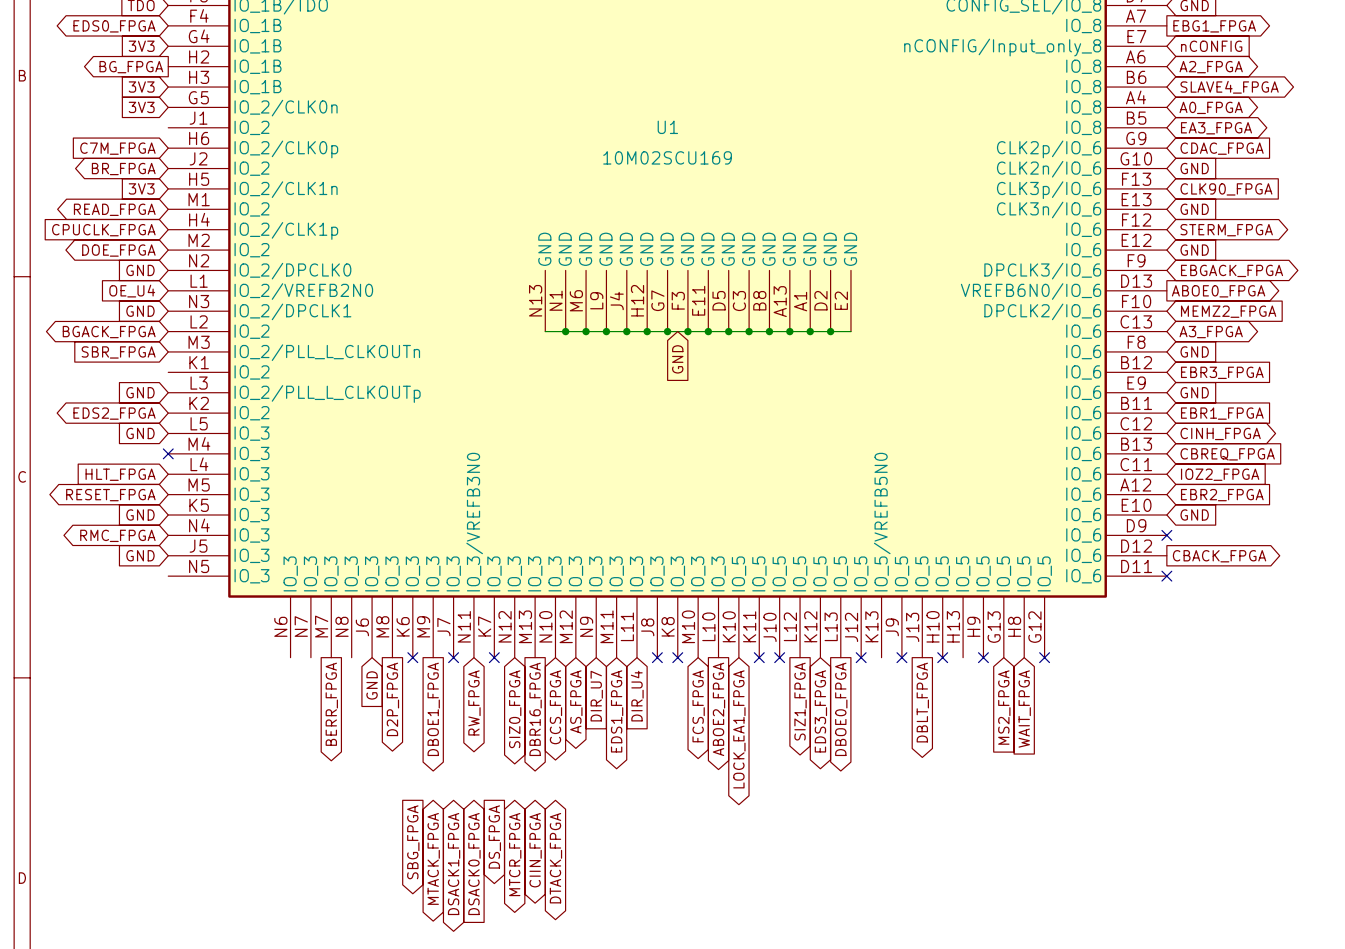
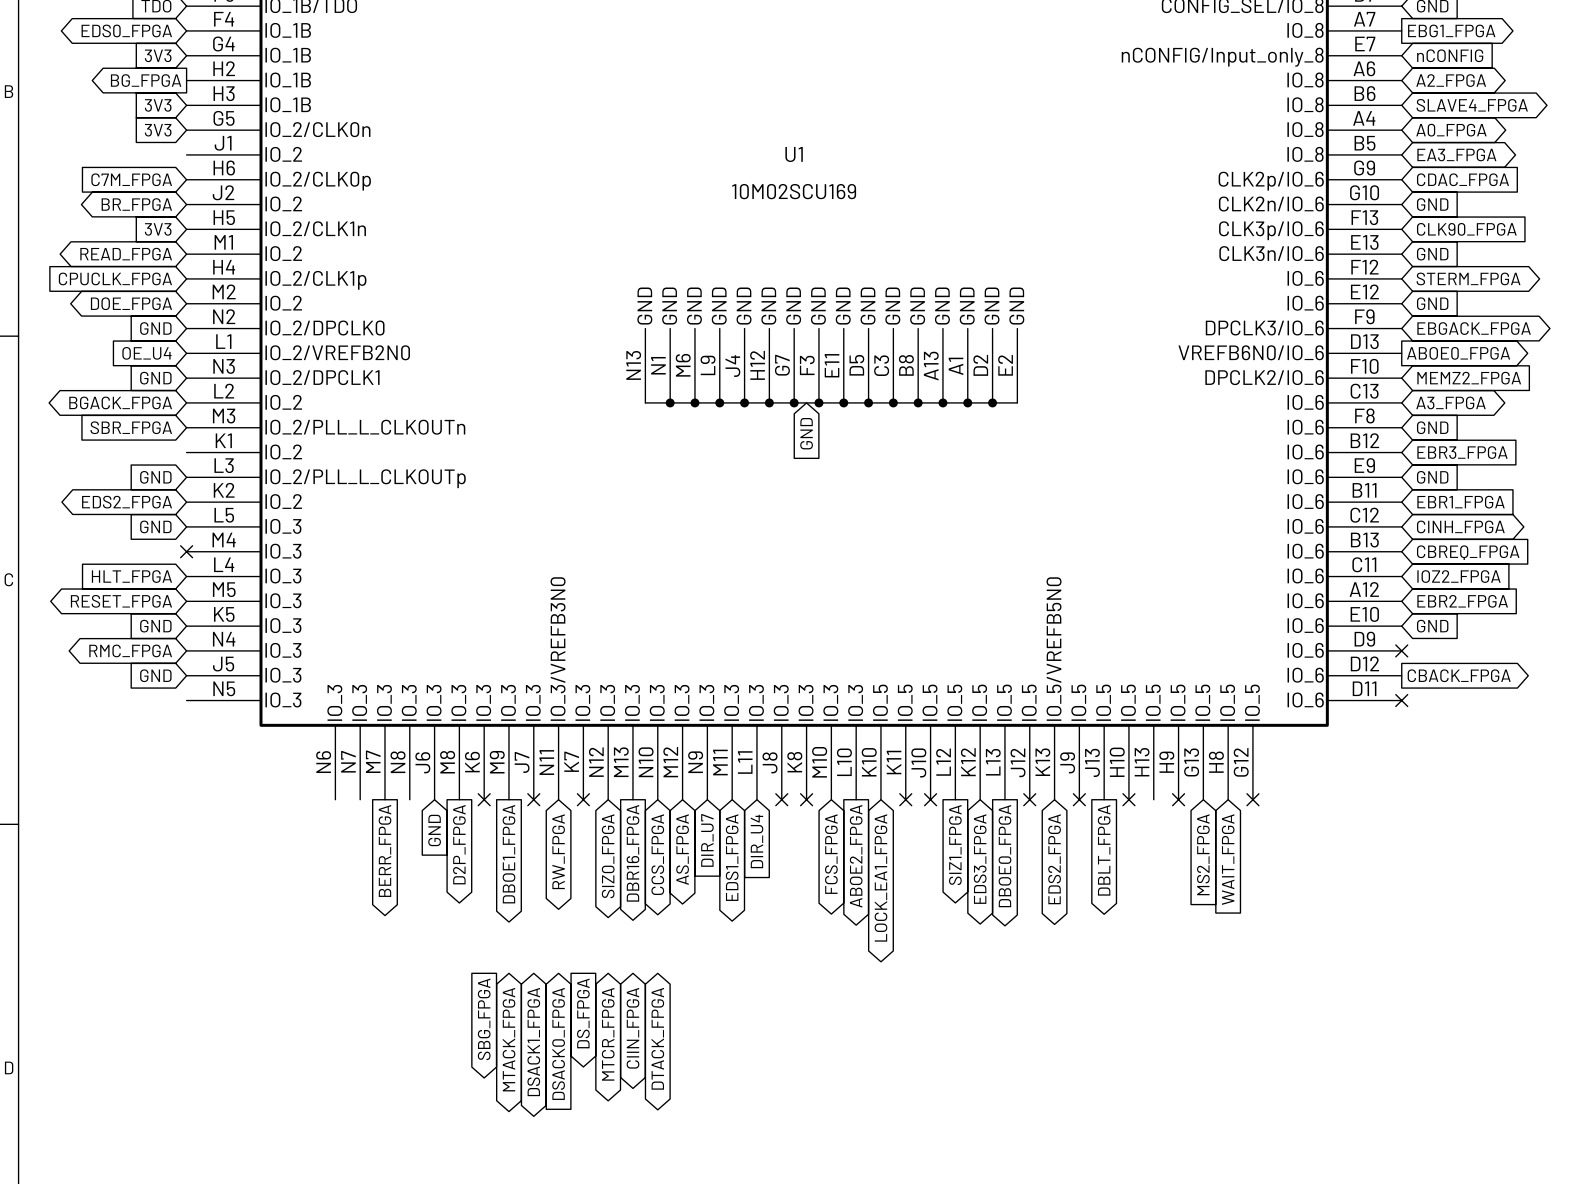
global label: none -> EDS2_FPGA (1054, 859)

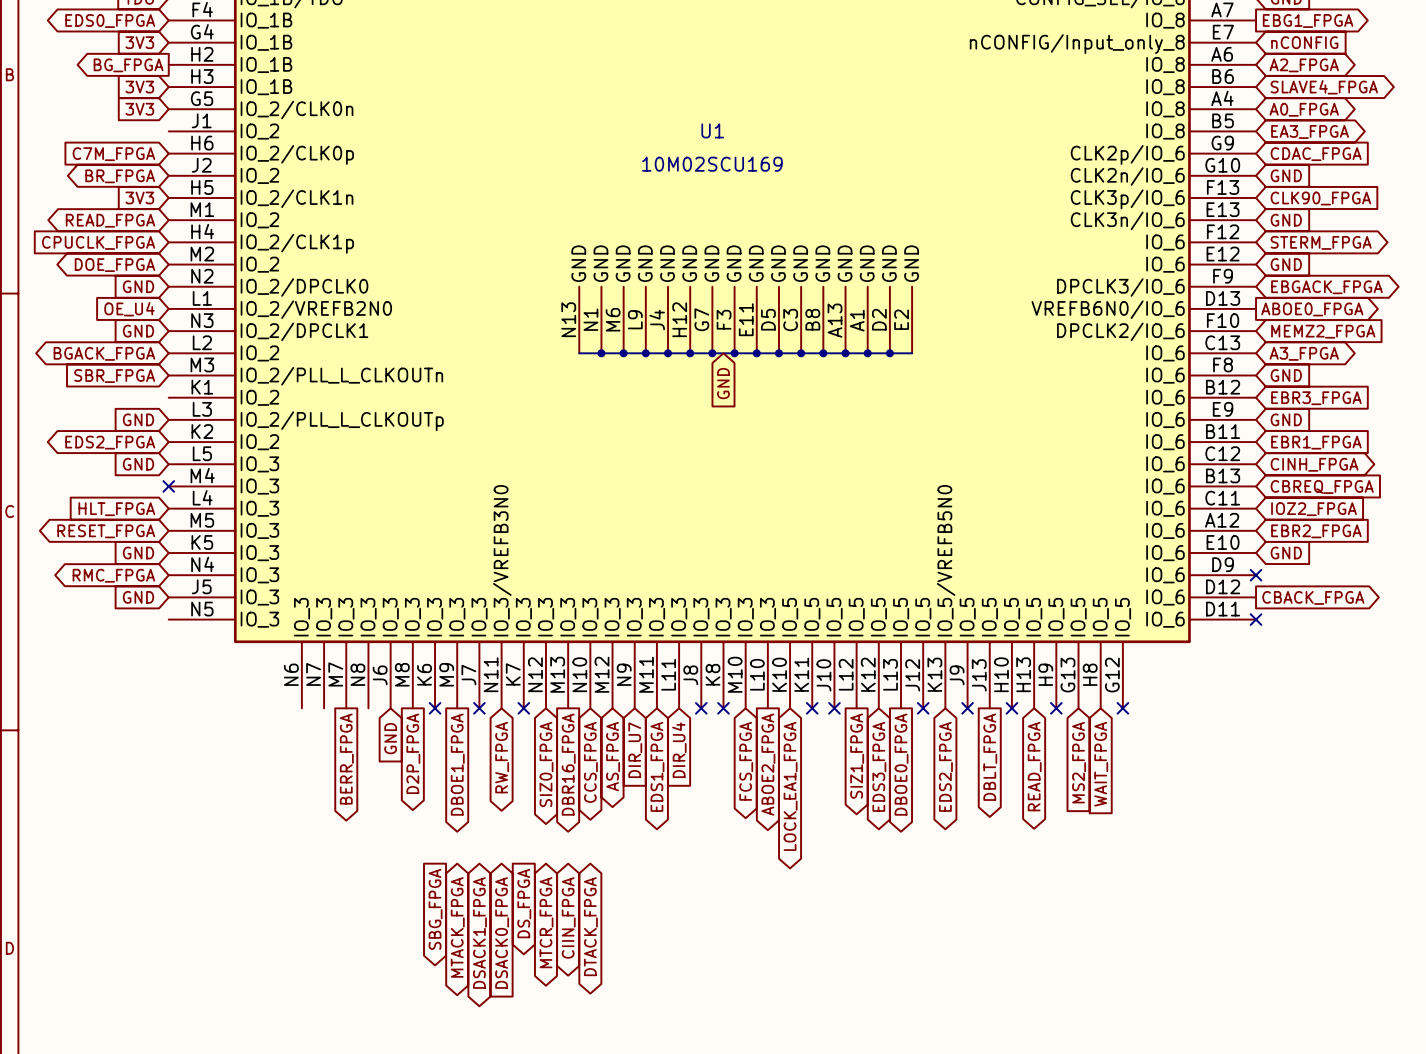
global label: none -> READ_FPGA (1034, 766)

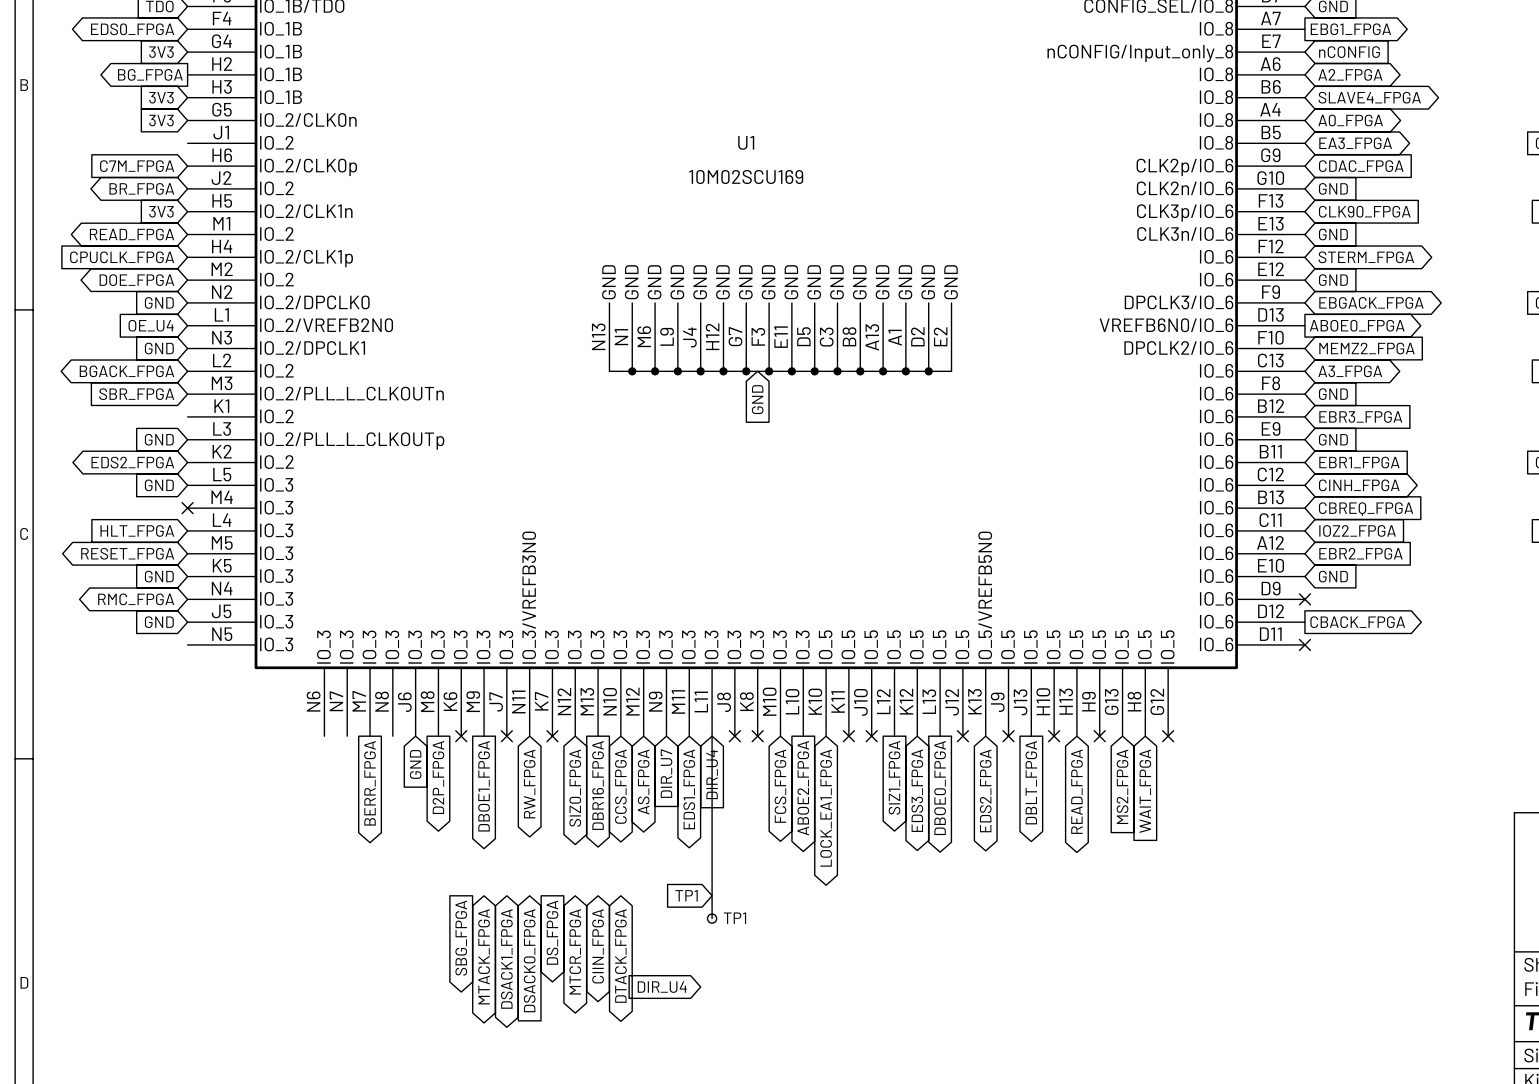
wire: none -> (712, 736) (712, 918)
global label: none -> TP1 (686, 895)
TP1: none -> (712, 918)
global label: none -> DIR_U4 (662, 987)

